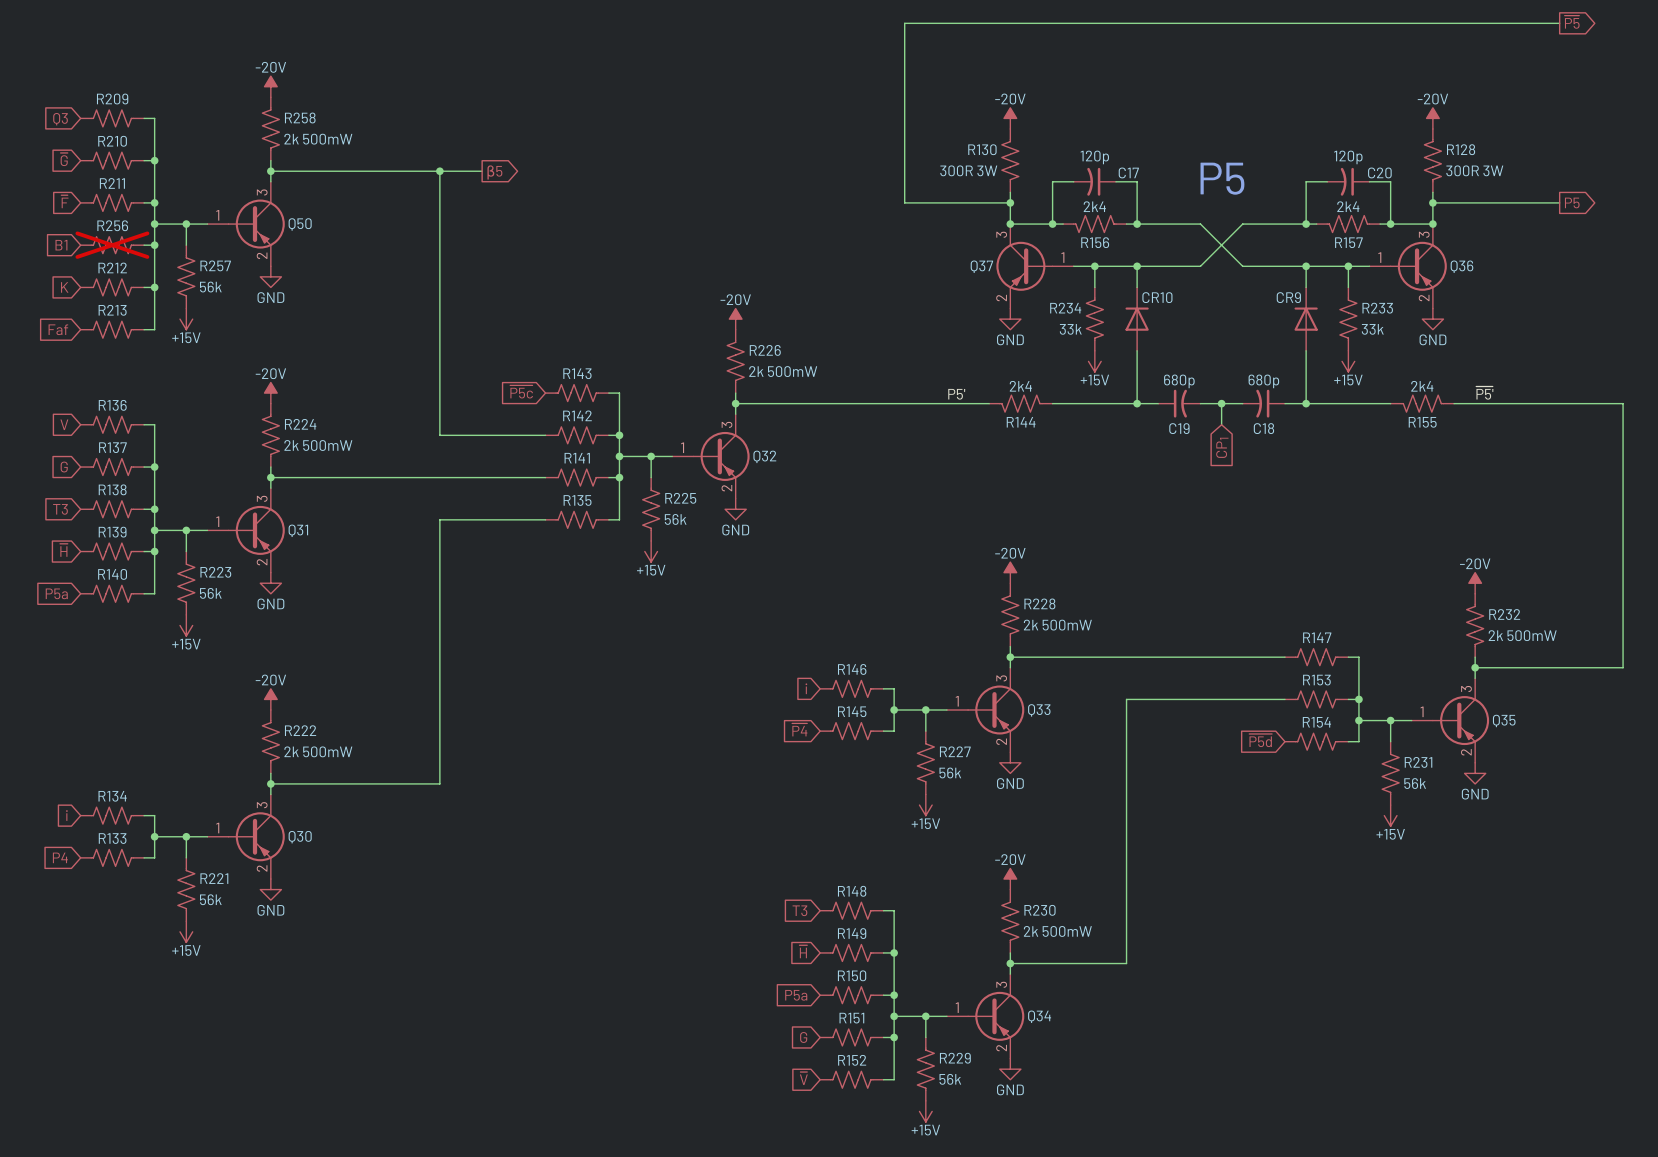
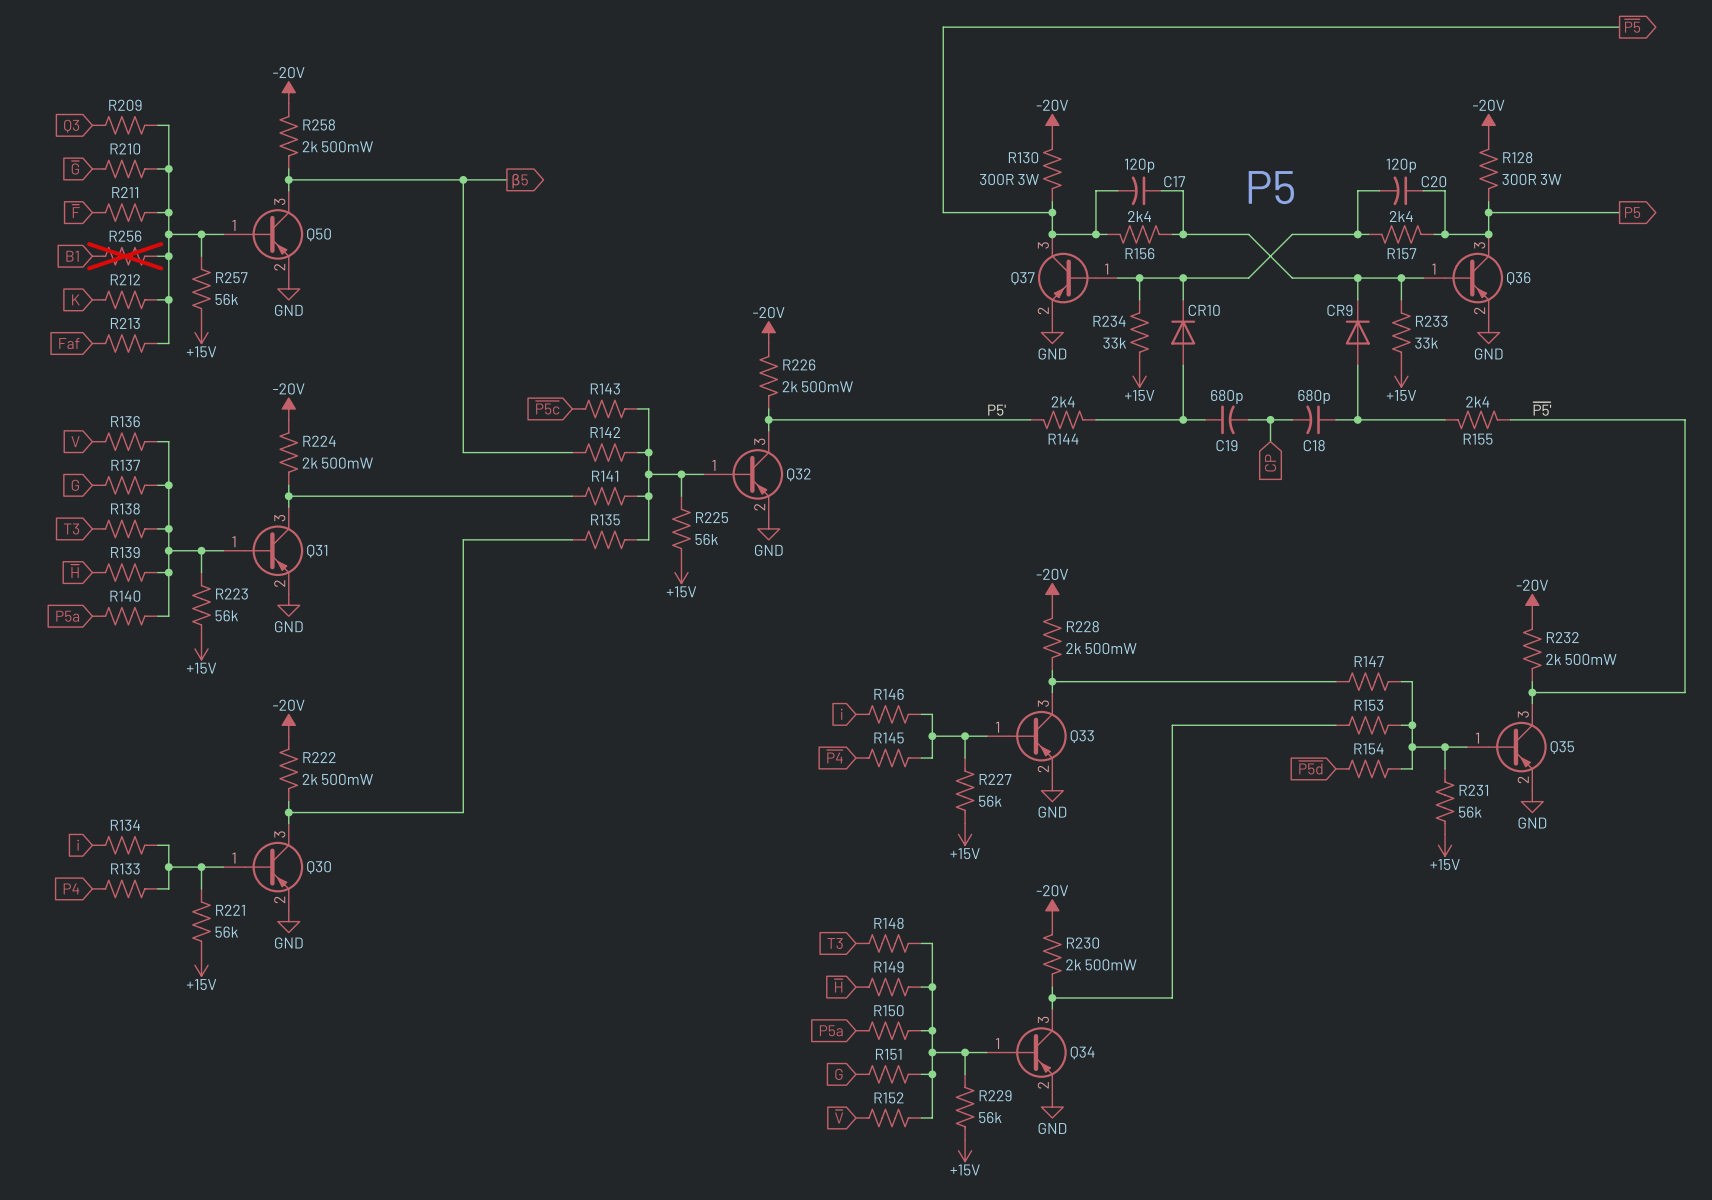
global label: CP1 (1222, 447) -> CP (1270, 463)

